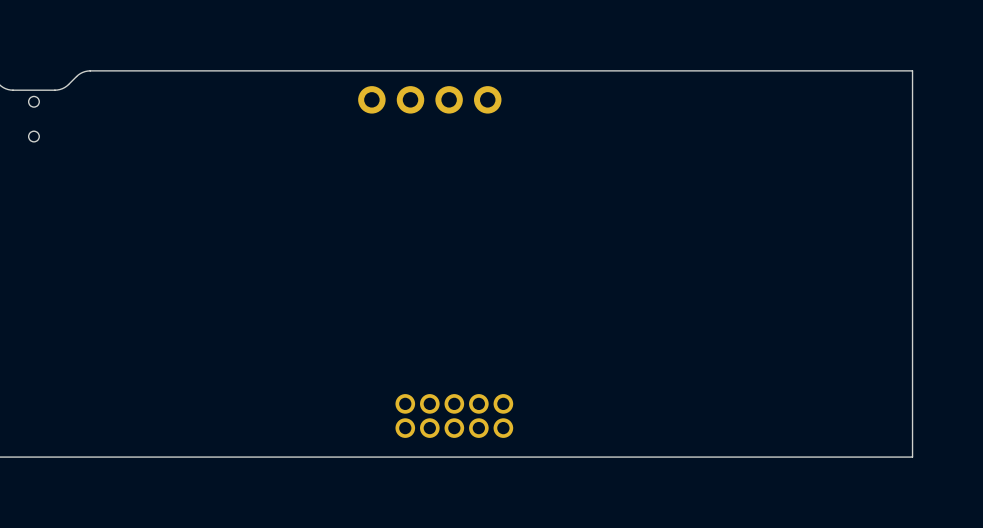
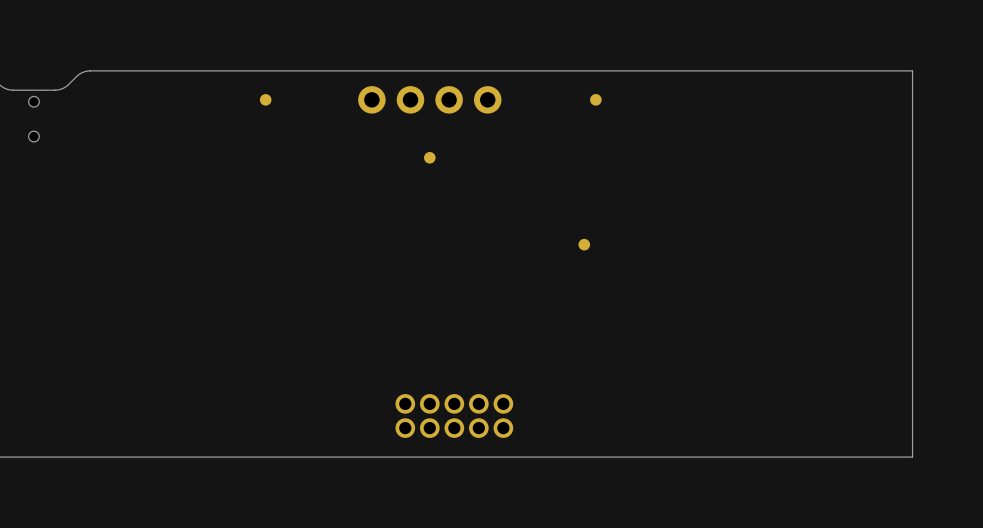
part: none -> (265, 99)
part: none -> (595, 99)
part: none -> (429, 157)
part: none -> (584, 244)

